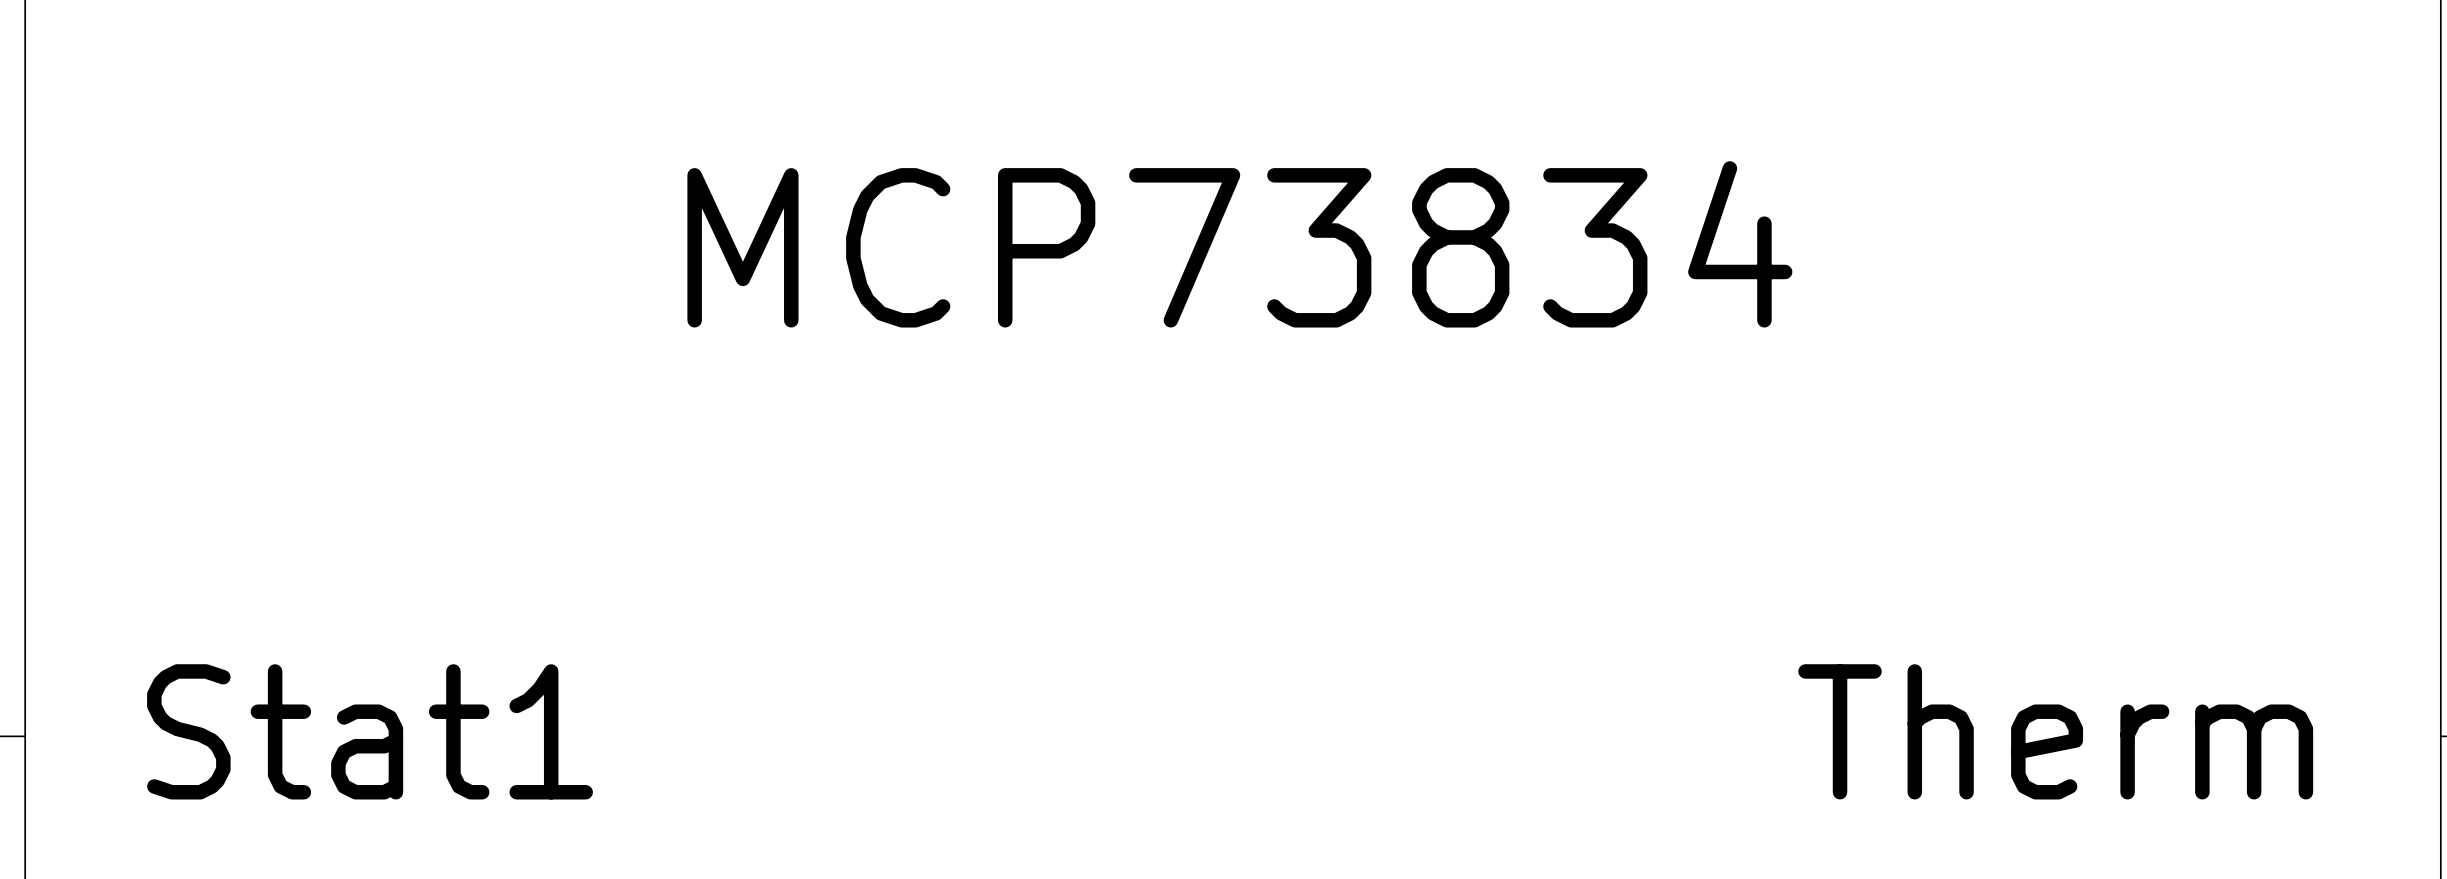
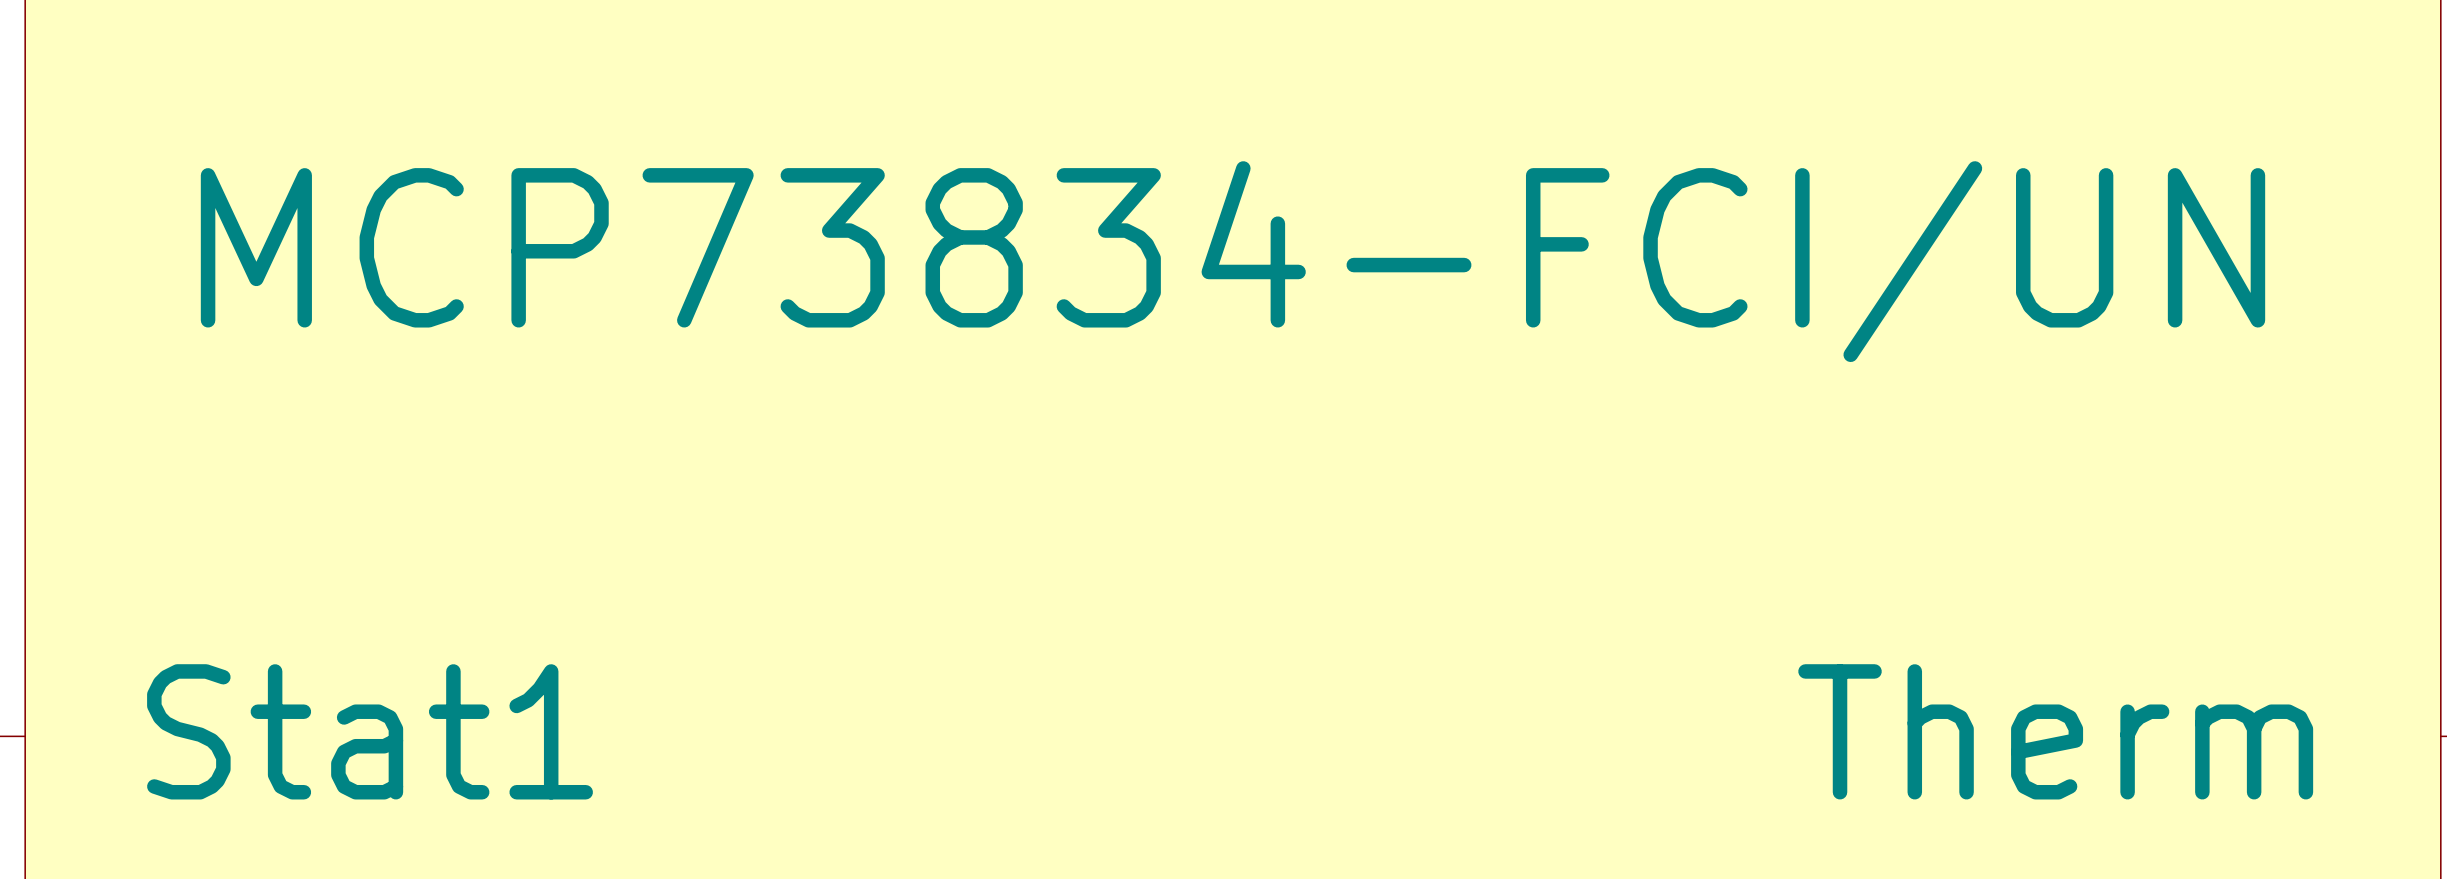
part value: MCP73834 (1239, 244) -> MCP73834-FCI/UN (1232, 261)

